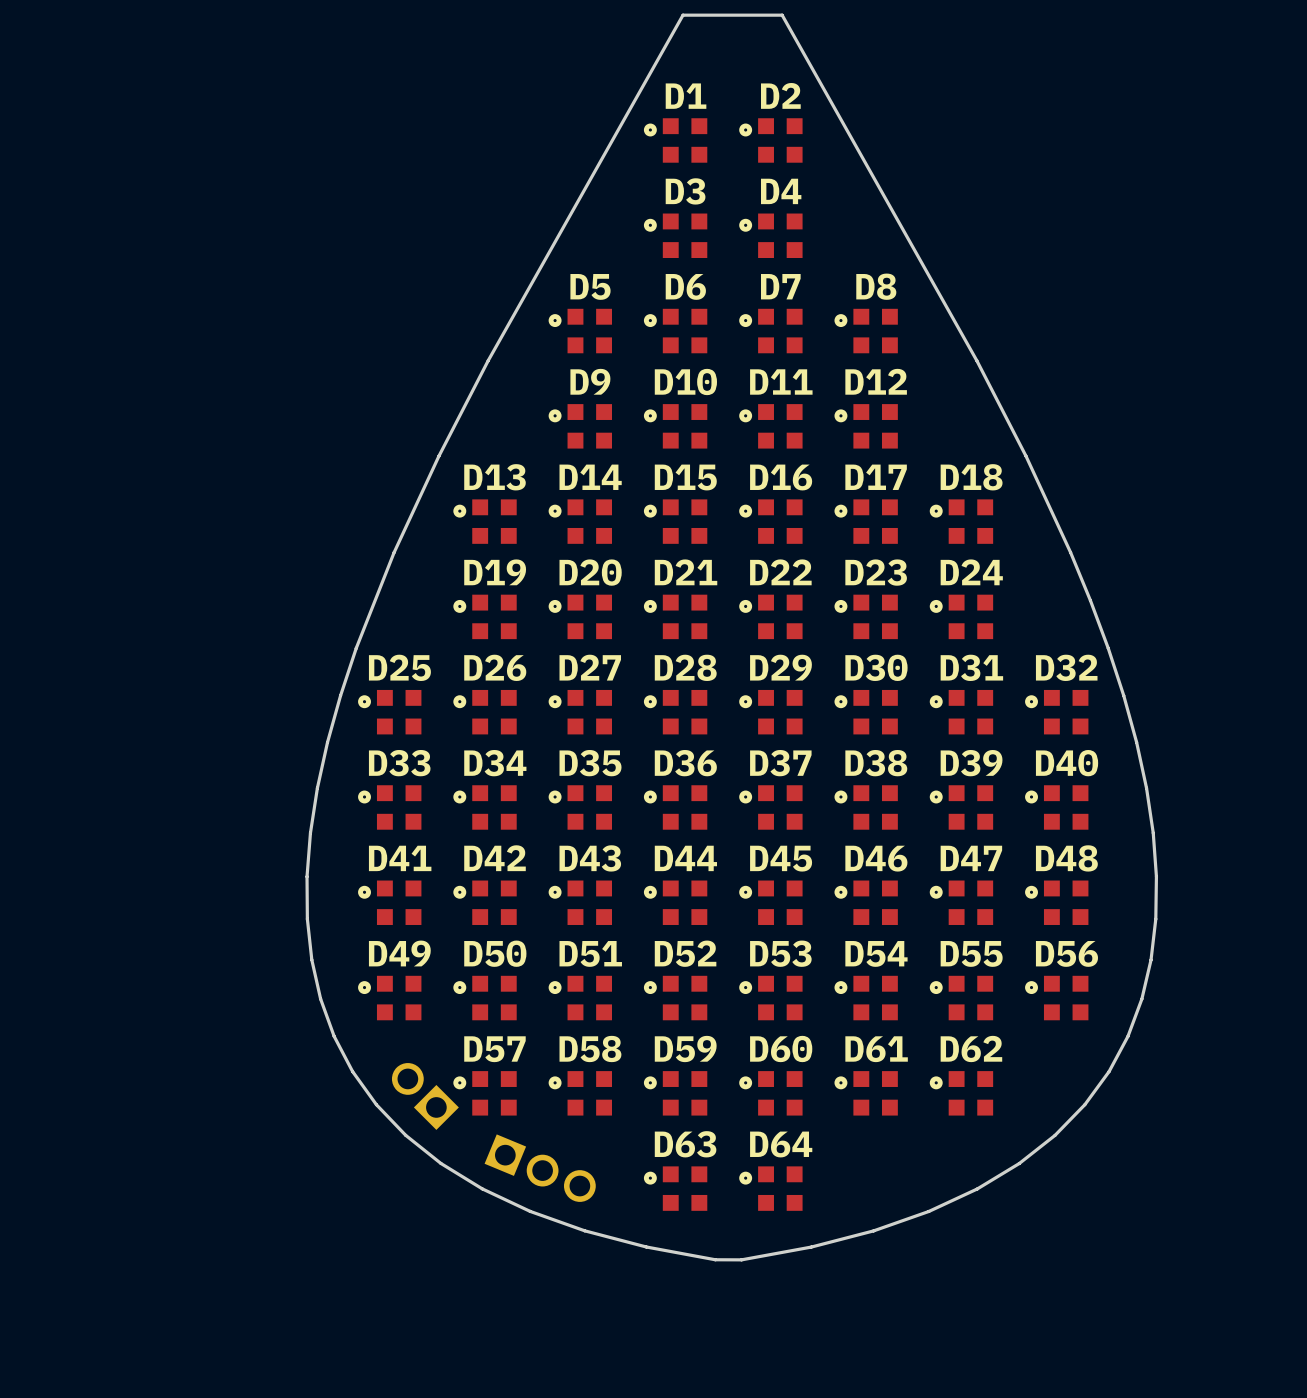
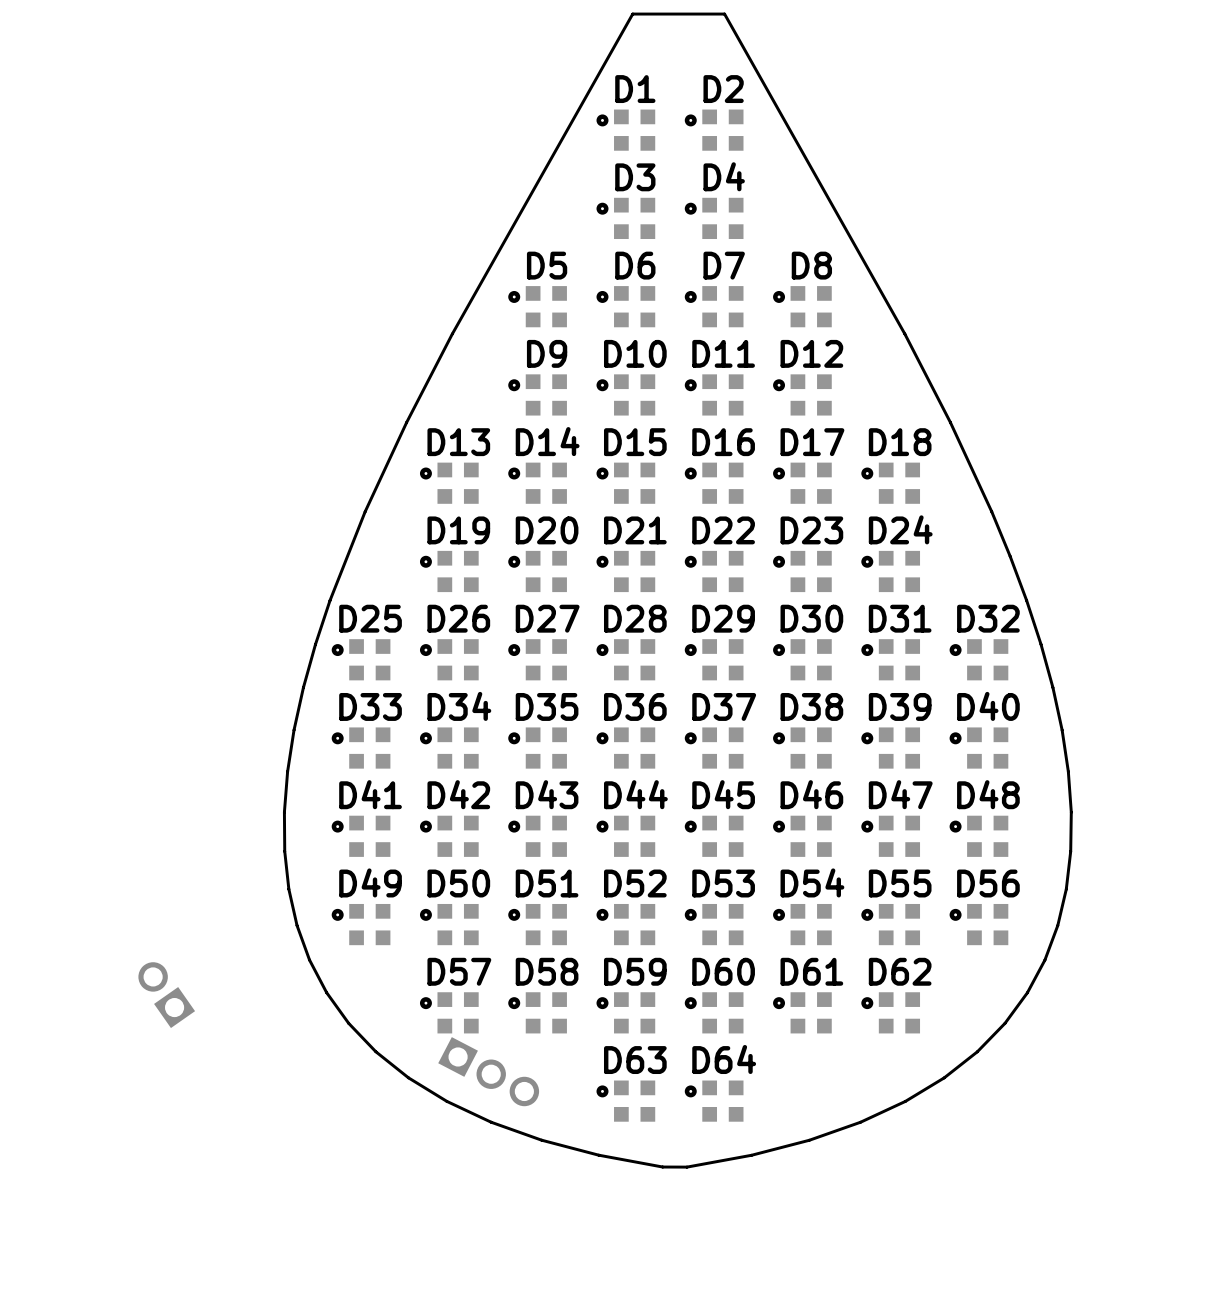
part: none -> (166, 995)
part: (425, 1096) -> none
part rotation: 0° (540, 1168) -> 5° clockwise (488, 1071)

